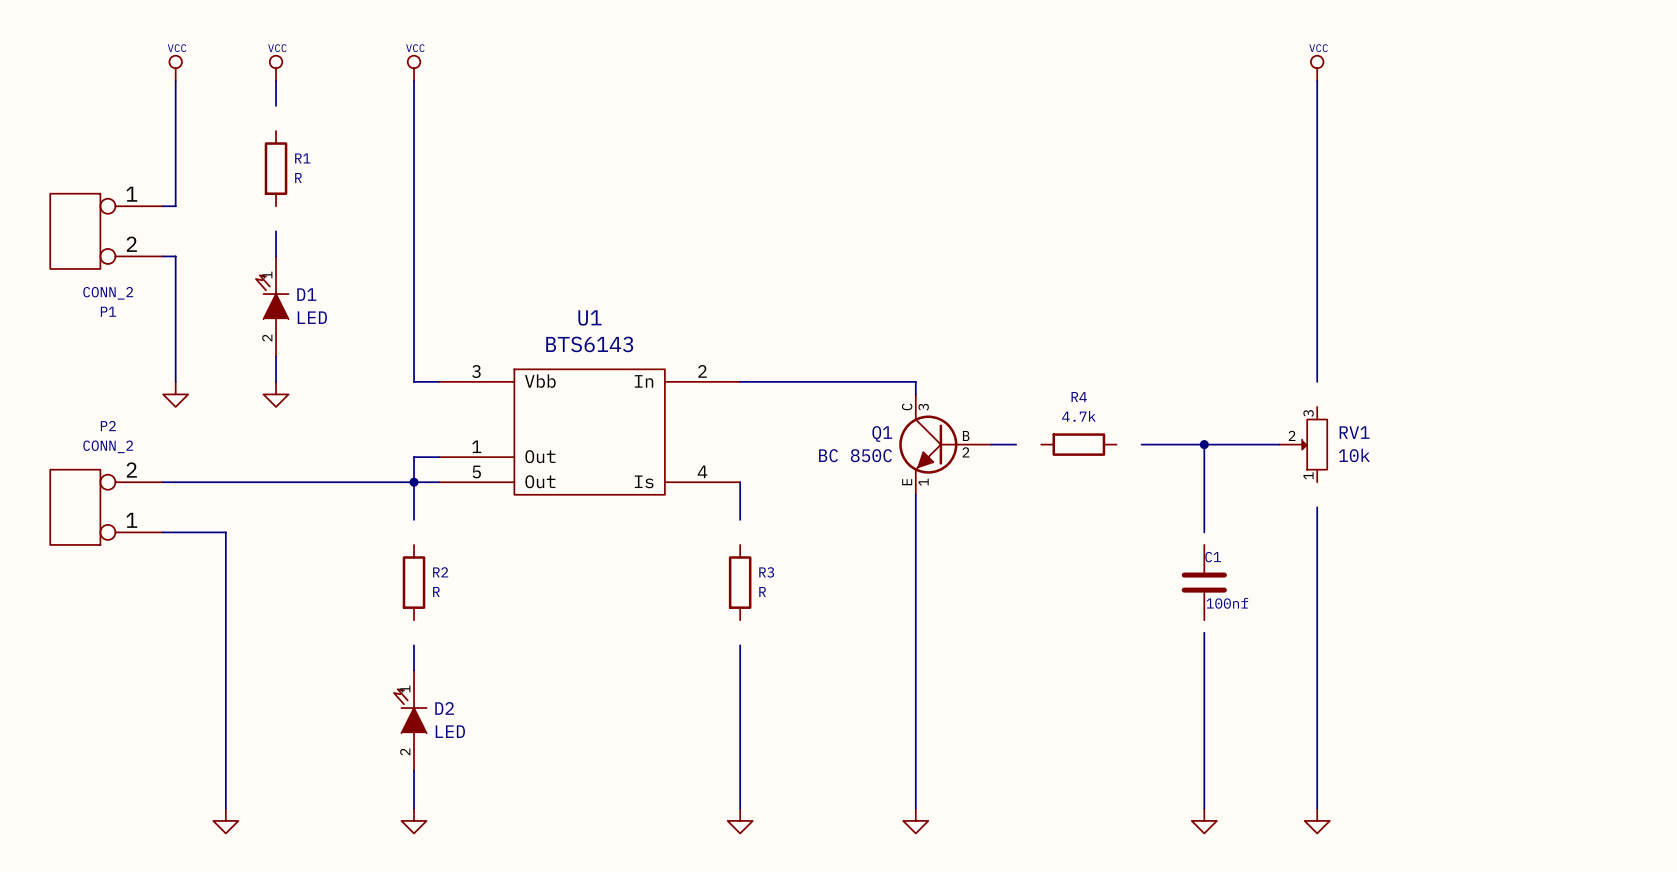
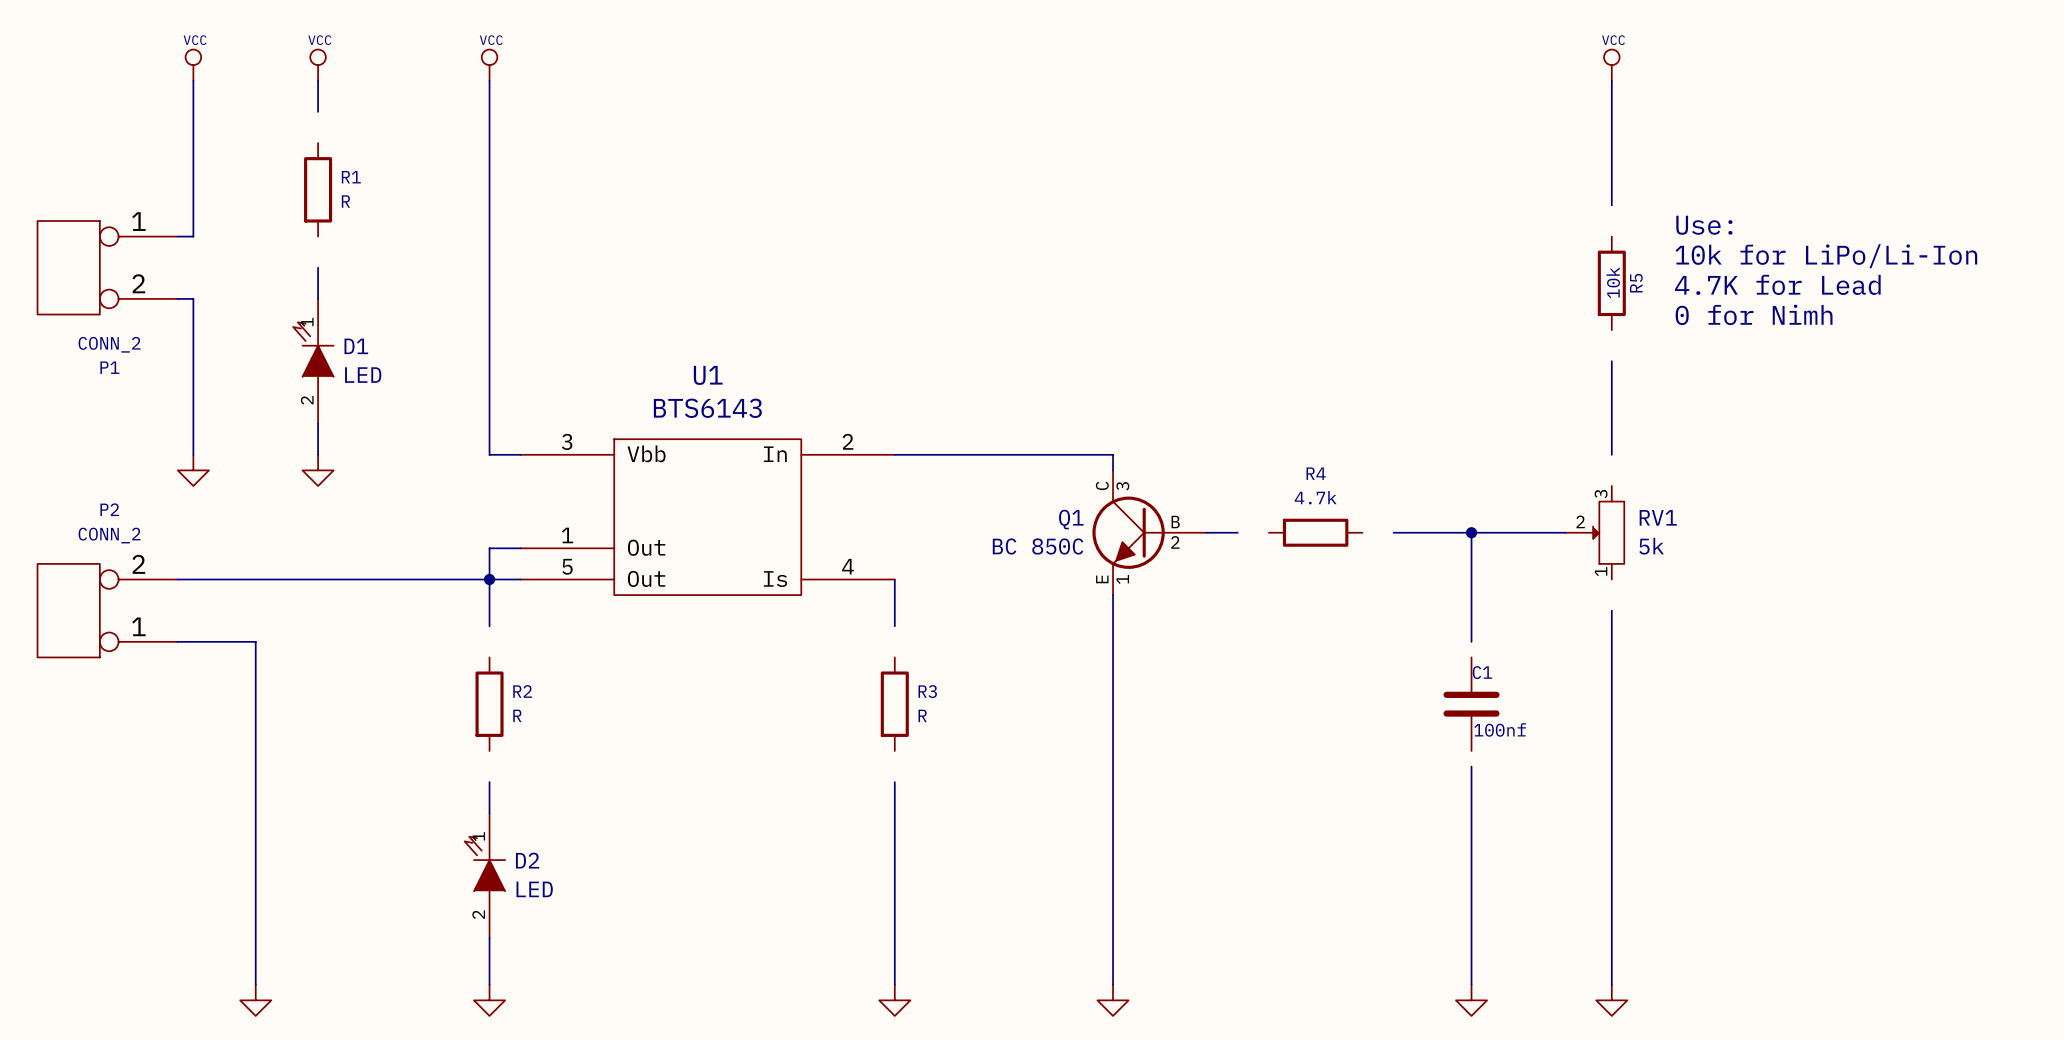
wire: (1317, 181) (1317, 306) -> none
text: none -> Use: (1704, 225)
text: none -> 10k for LiPo/Li-Ion (1826, 256)
R5: none -> 10k (1611, 283)
text: none -> 4.7K for Lead (1777, 284)
text: none -> 0 for Nimh (1754, 314)
RV1 value: 10k (1354, 455) -> 5k (1651, 546)

